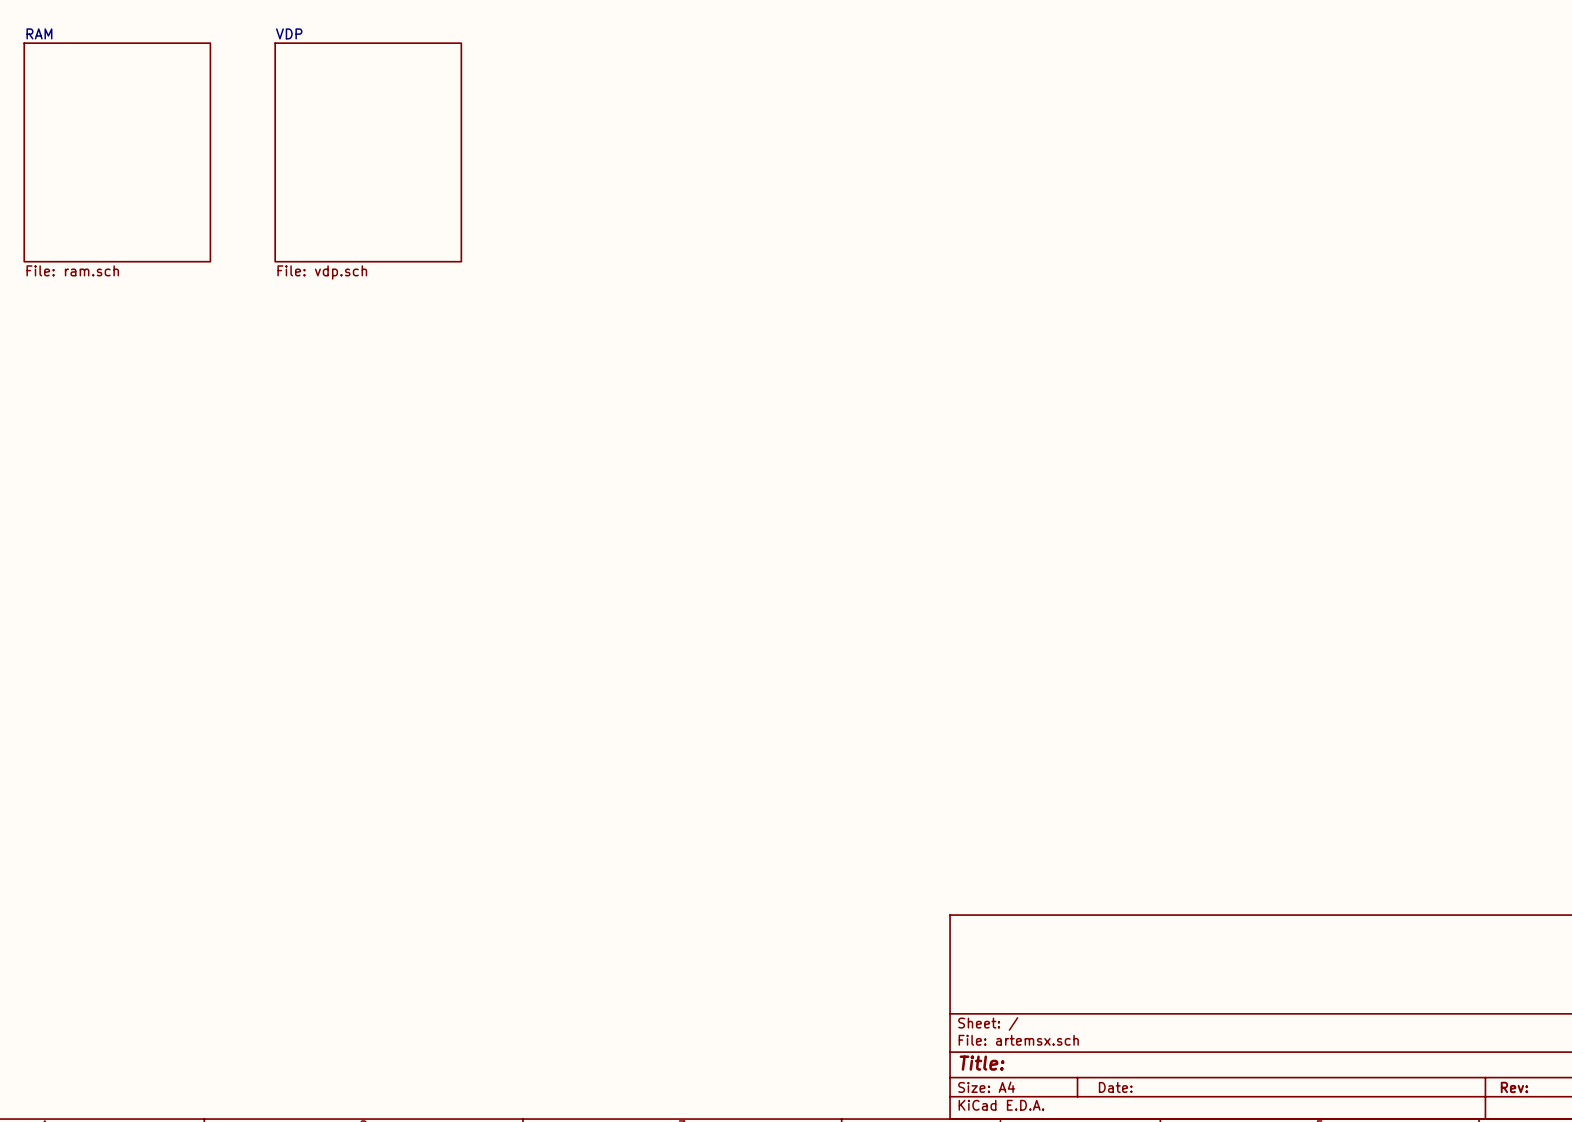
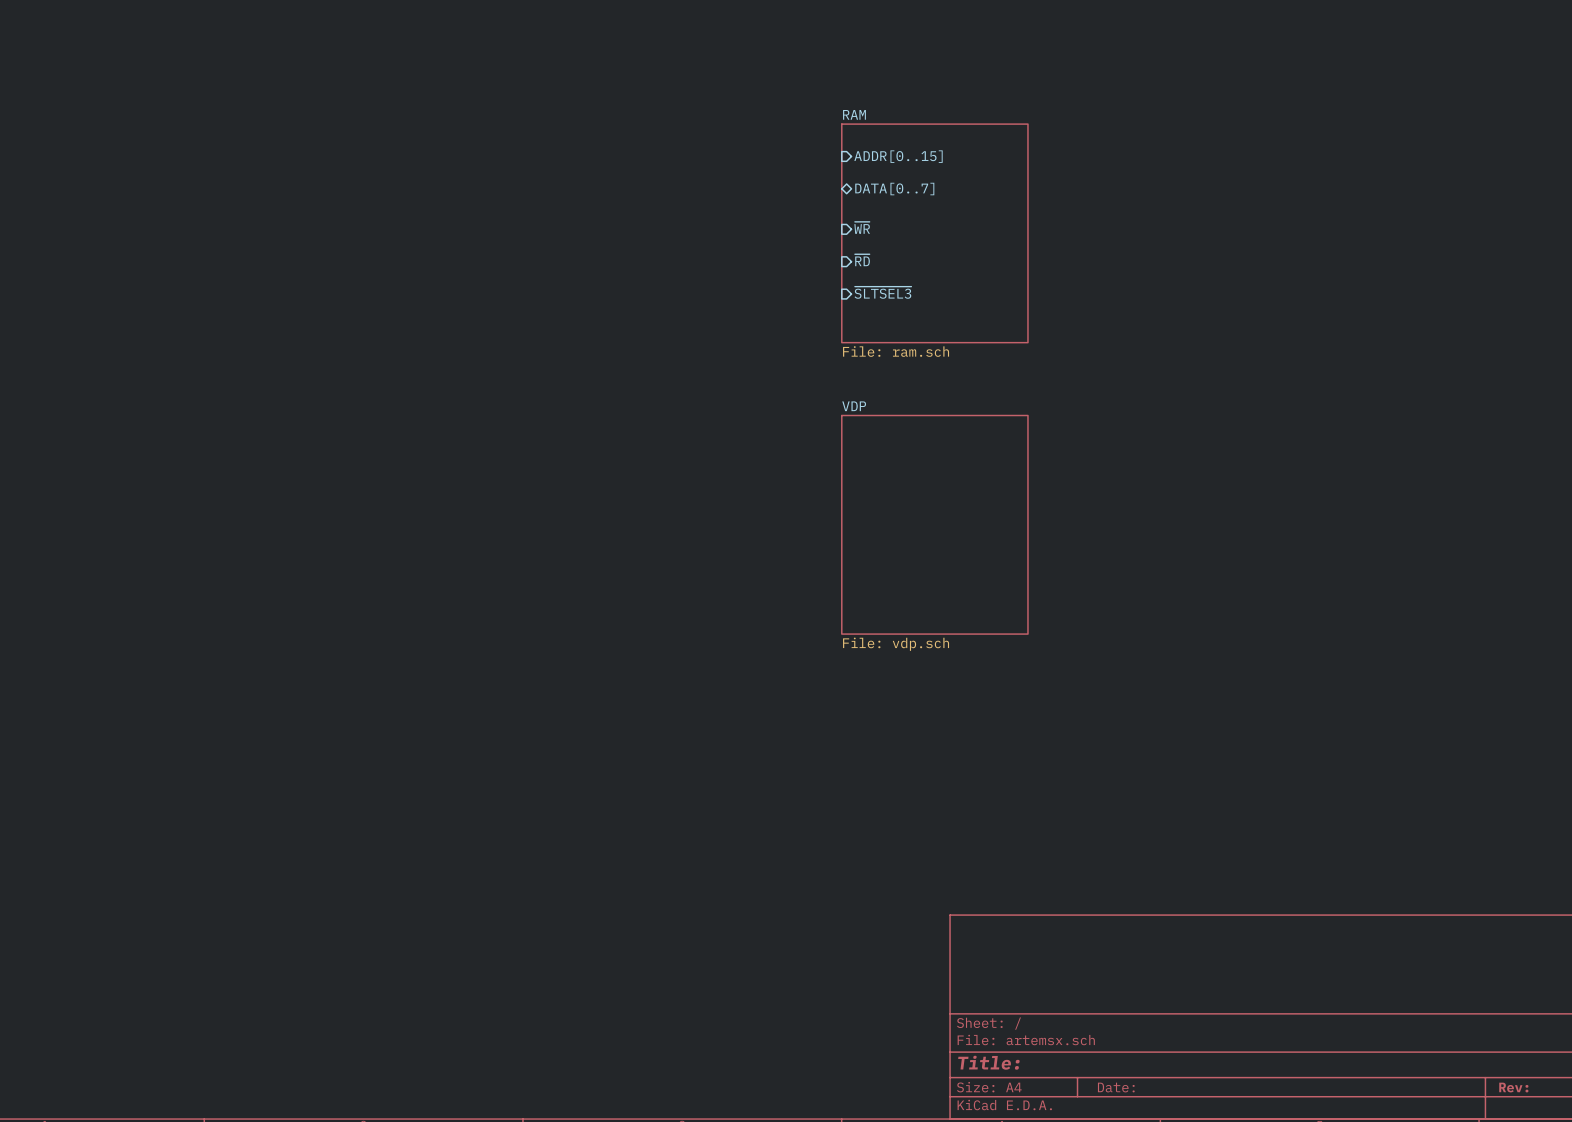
sheet RAM: File: ram.sch (117, 152) -> none
sheet VDP: File: vdp.sch (368, 152) -> none
sheet pin: none -> ADDR[0..15] (898, 156)
sheet pin: none -> DATA[0..7] (894, 189)
sheet pin: none -> ~{WR} (862, 227)
sheet RAM: none -> File: ram.sch (934, 233)
sheet pin: none -> ~{RD} (862, 260)
sheet pin: none -> ~{SLTSEL3} (882, 292)
sheet VDP: none -> File: vdp.sch (934, 524)

